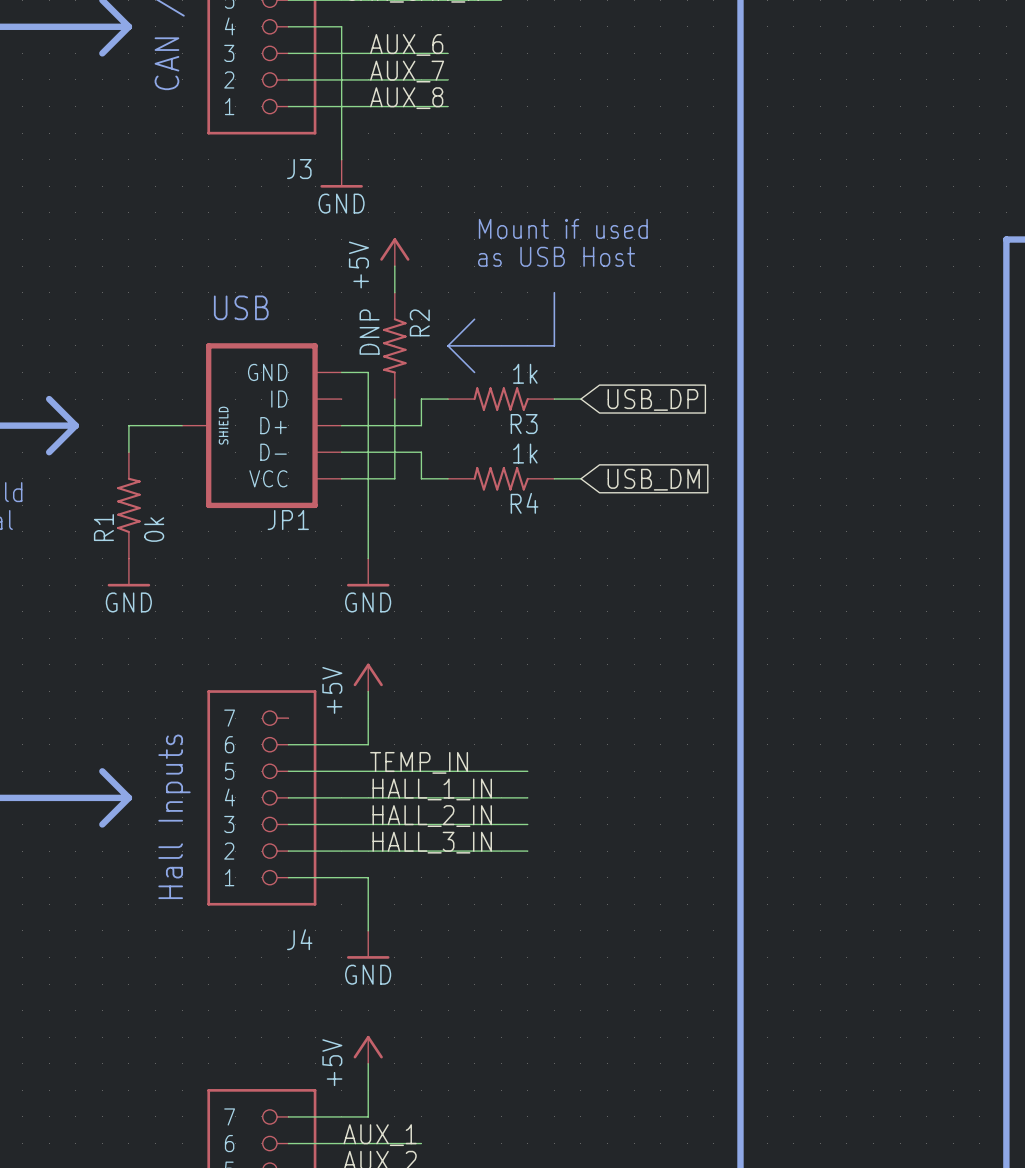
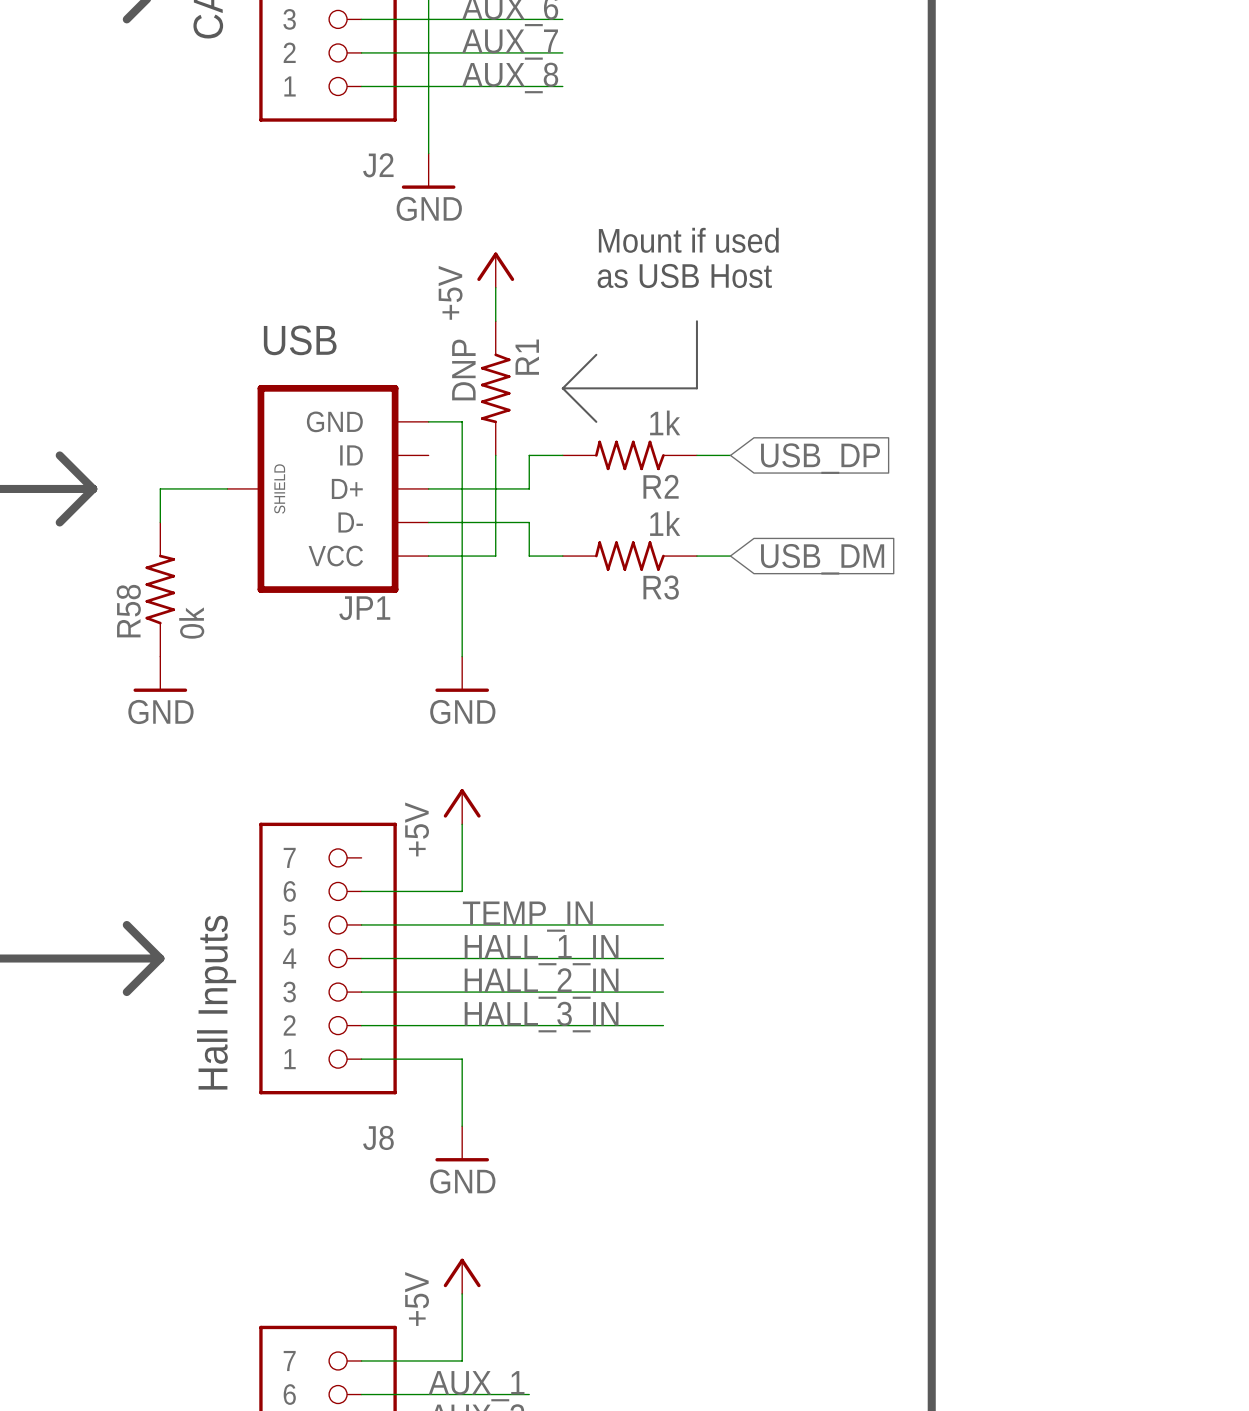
J3 name: J3 (299, 169) -> J2 (378, 165)
R2 name: R2 (419, 322) -> R1 (527, 357)
R3 name: R3 (524, 424) -> R2 (661, 486)
R4 name: R4 (524, 503) -> R3 (661, 587)
R1 name: R1 (103, 527) -> R58 (128, 611)
J4 name: J4 (299, 939) -> J8 (378, 1137)

